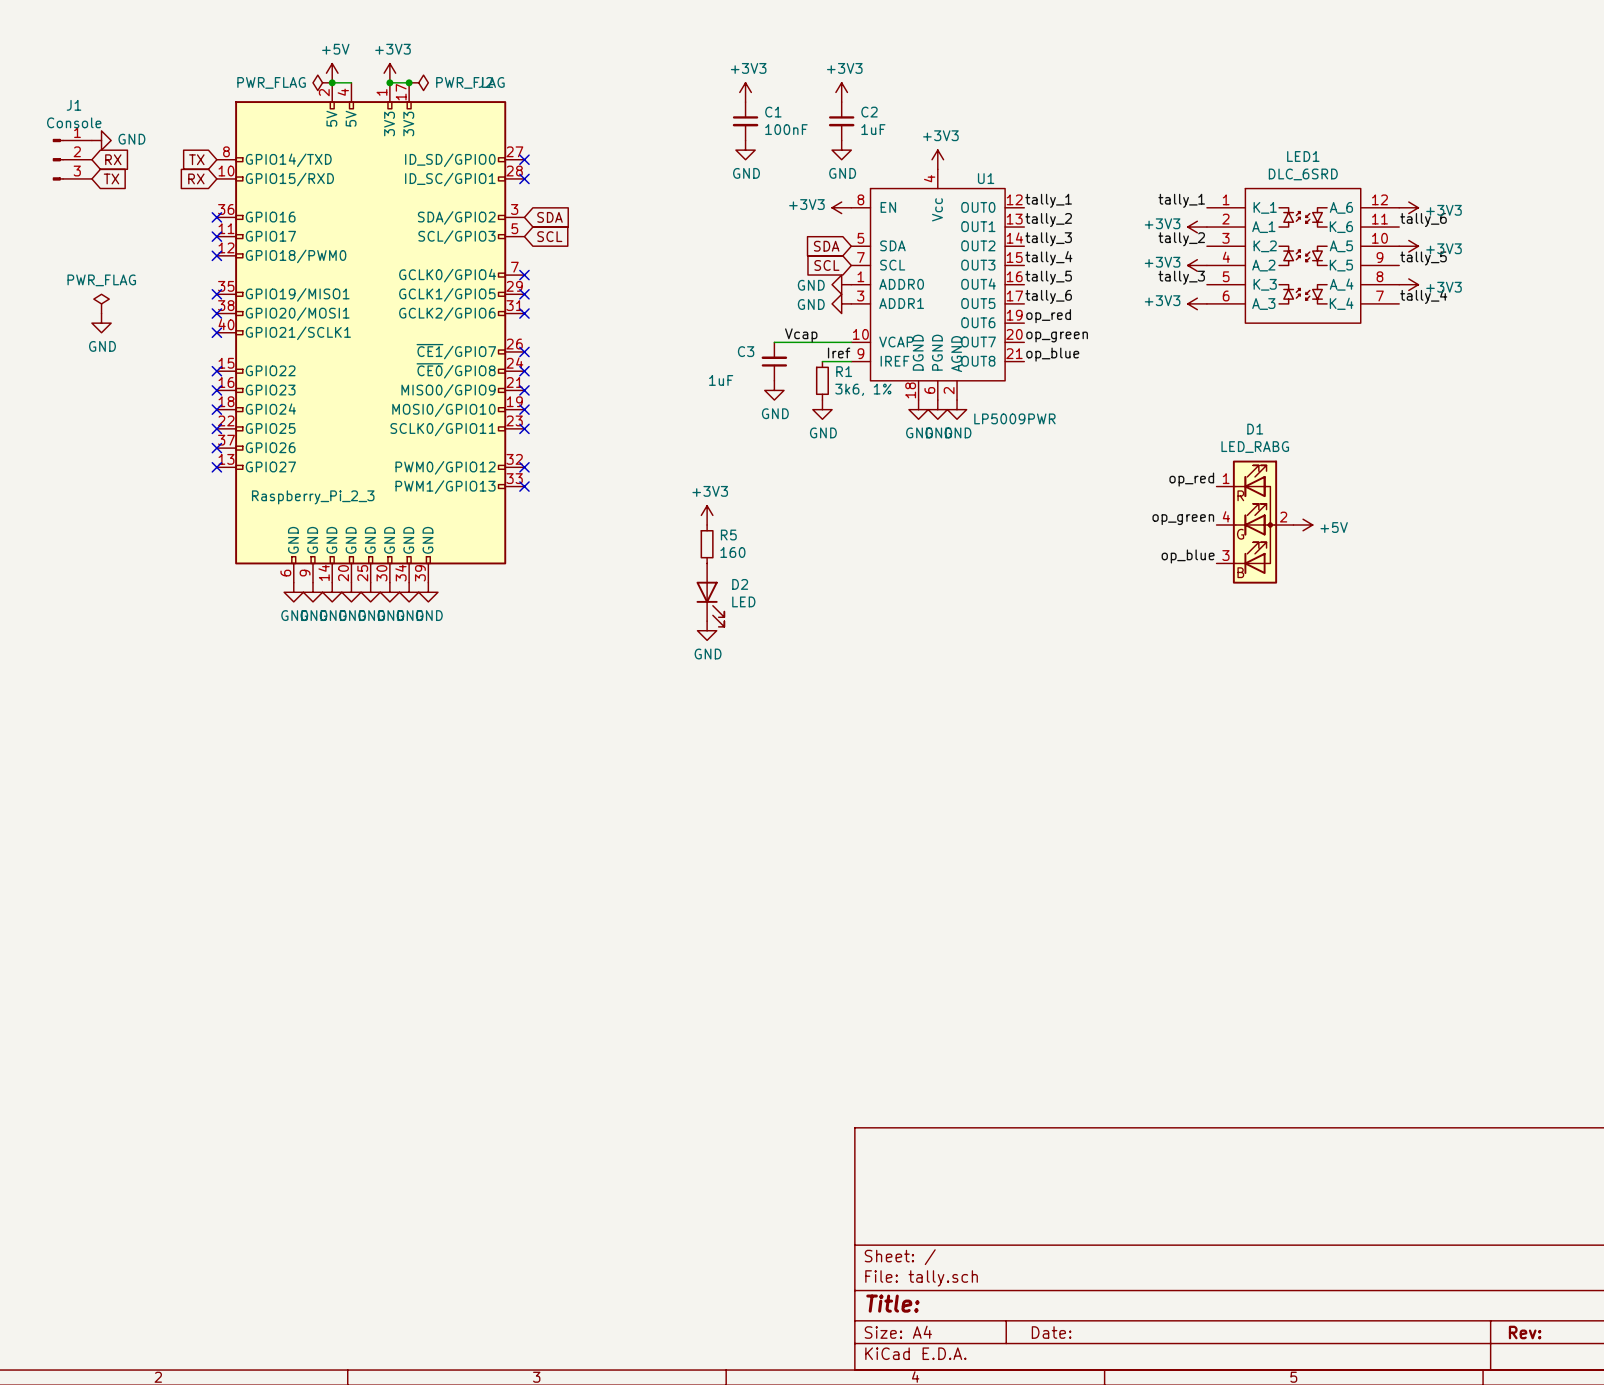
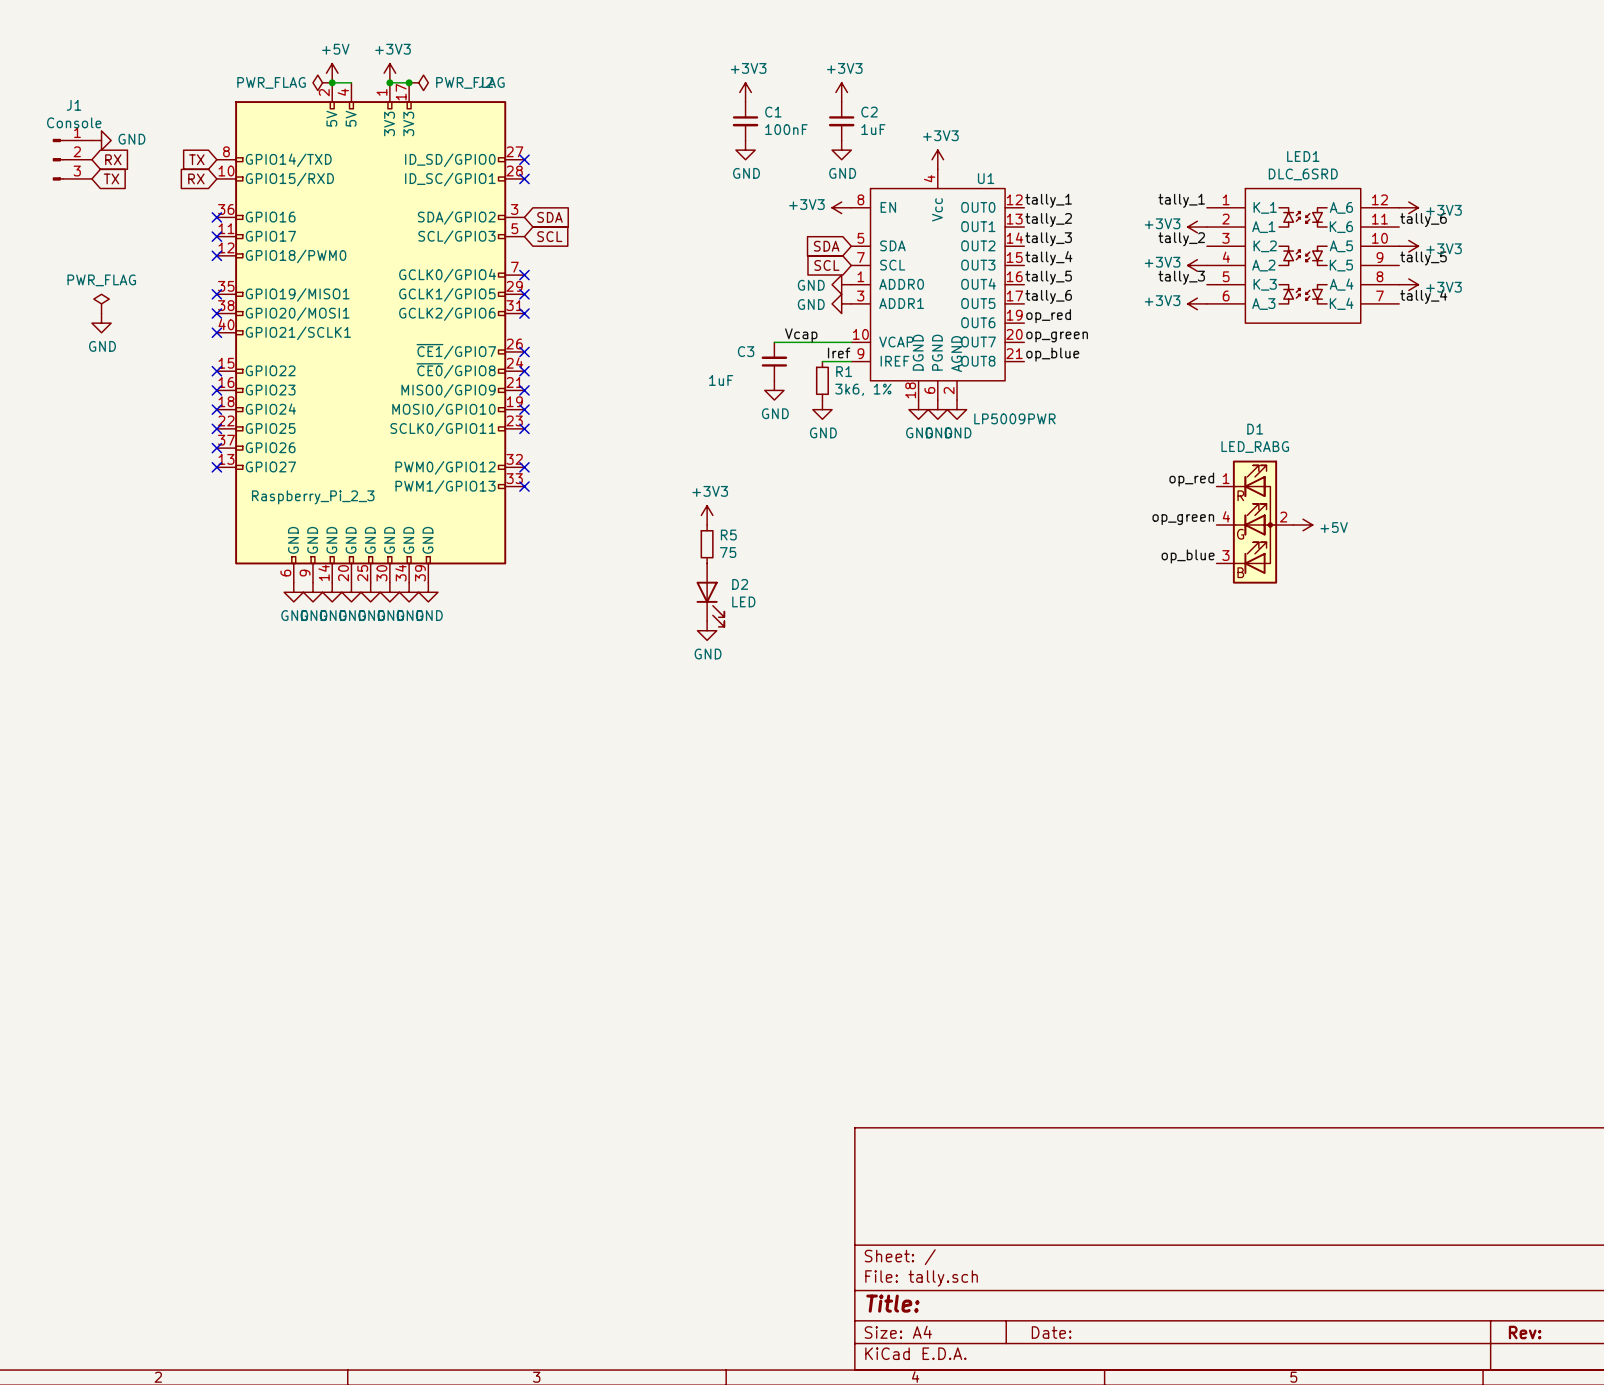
R5 value: 160 (732, 552) -> 75 (728, 552)

